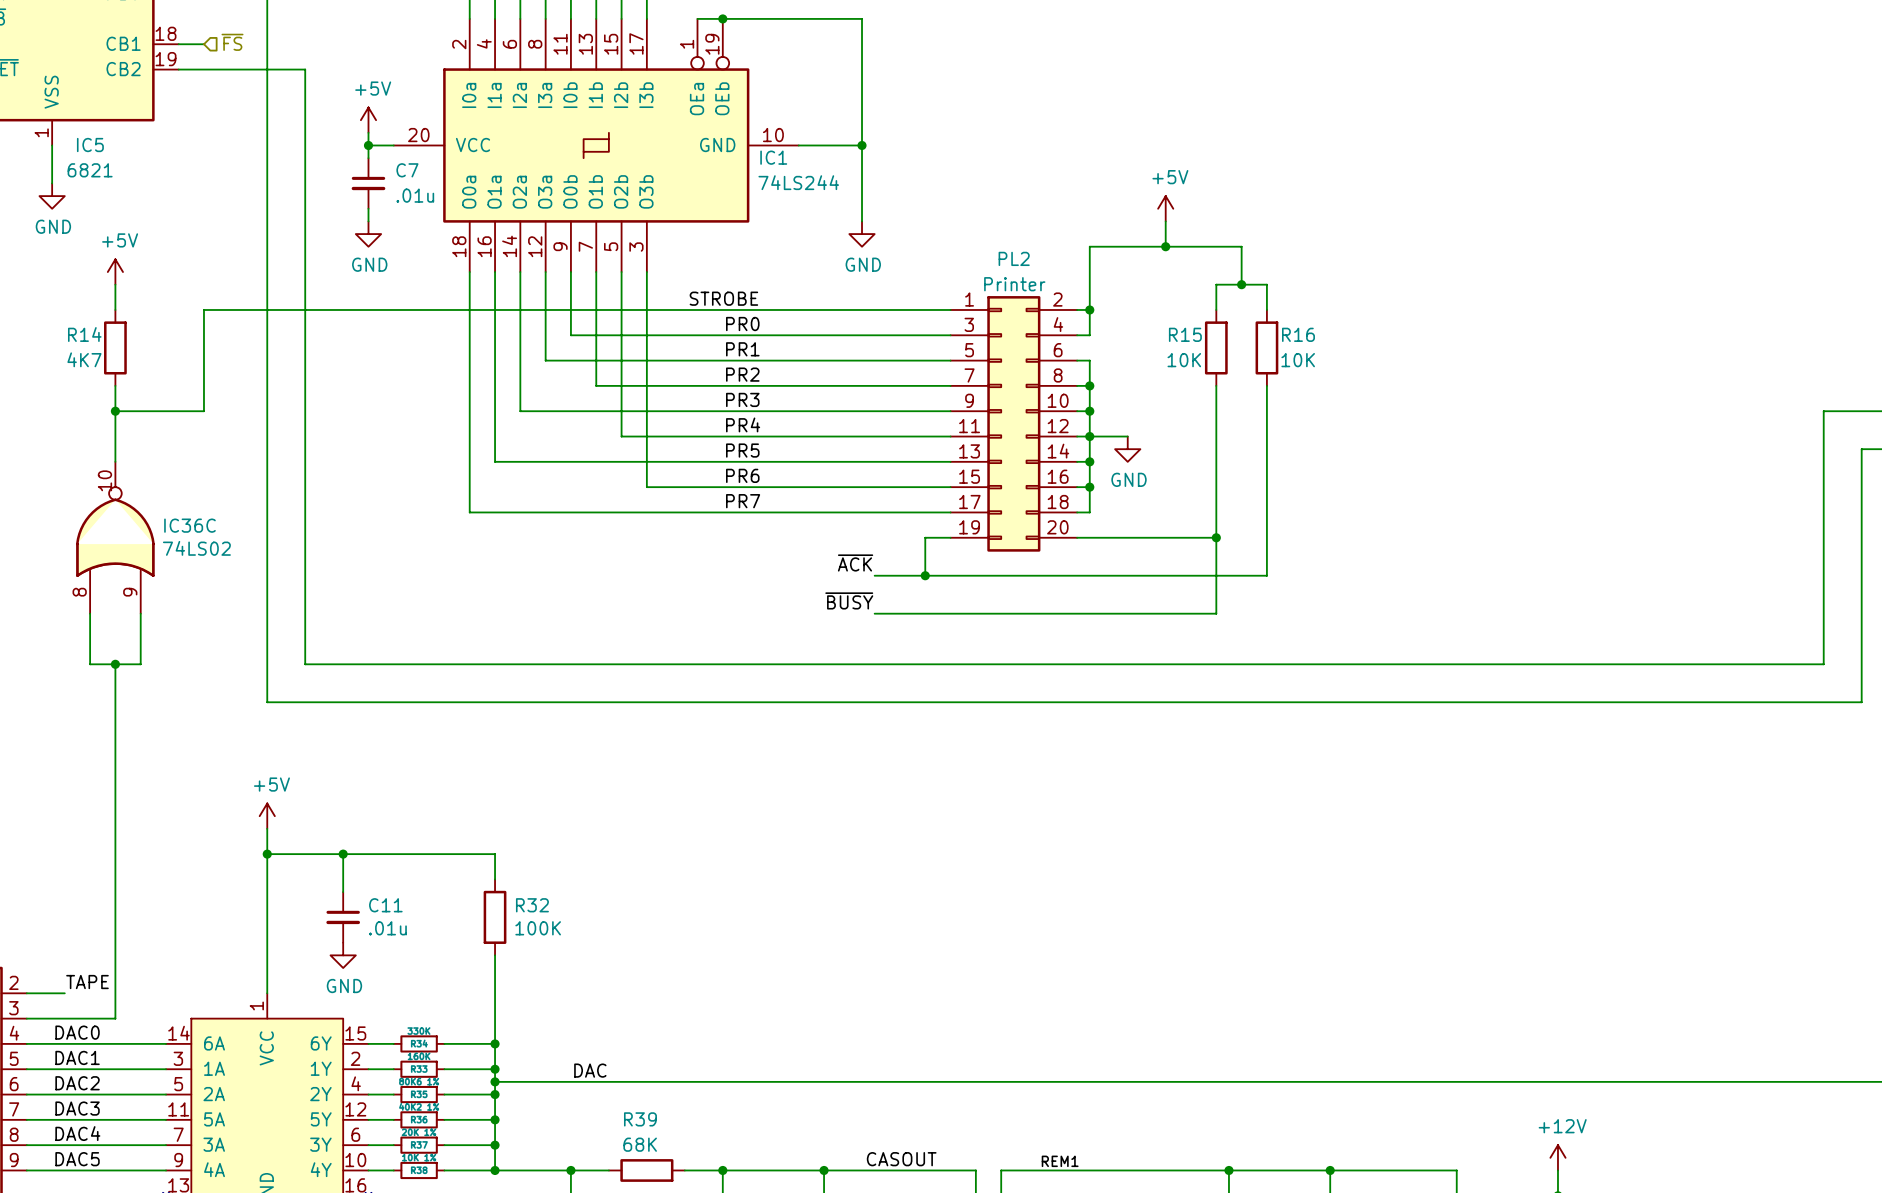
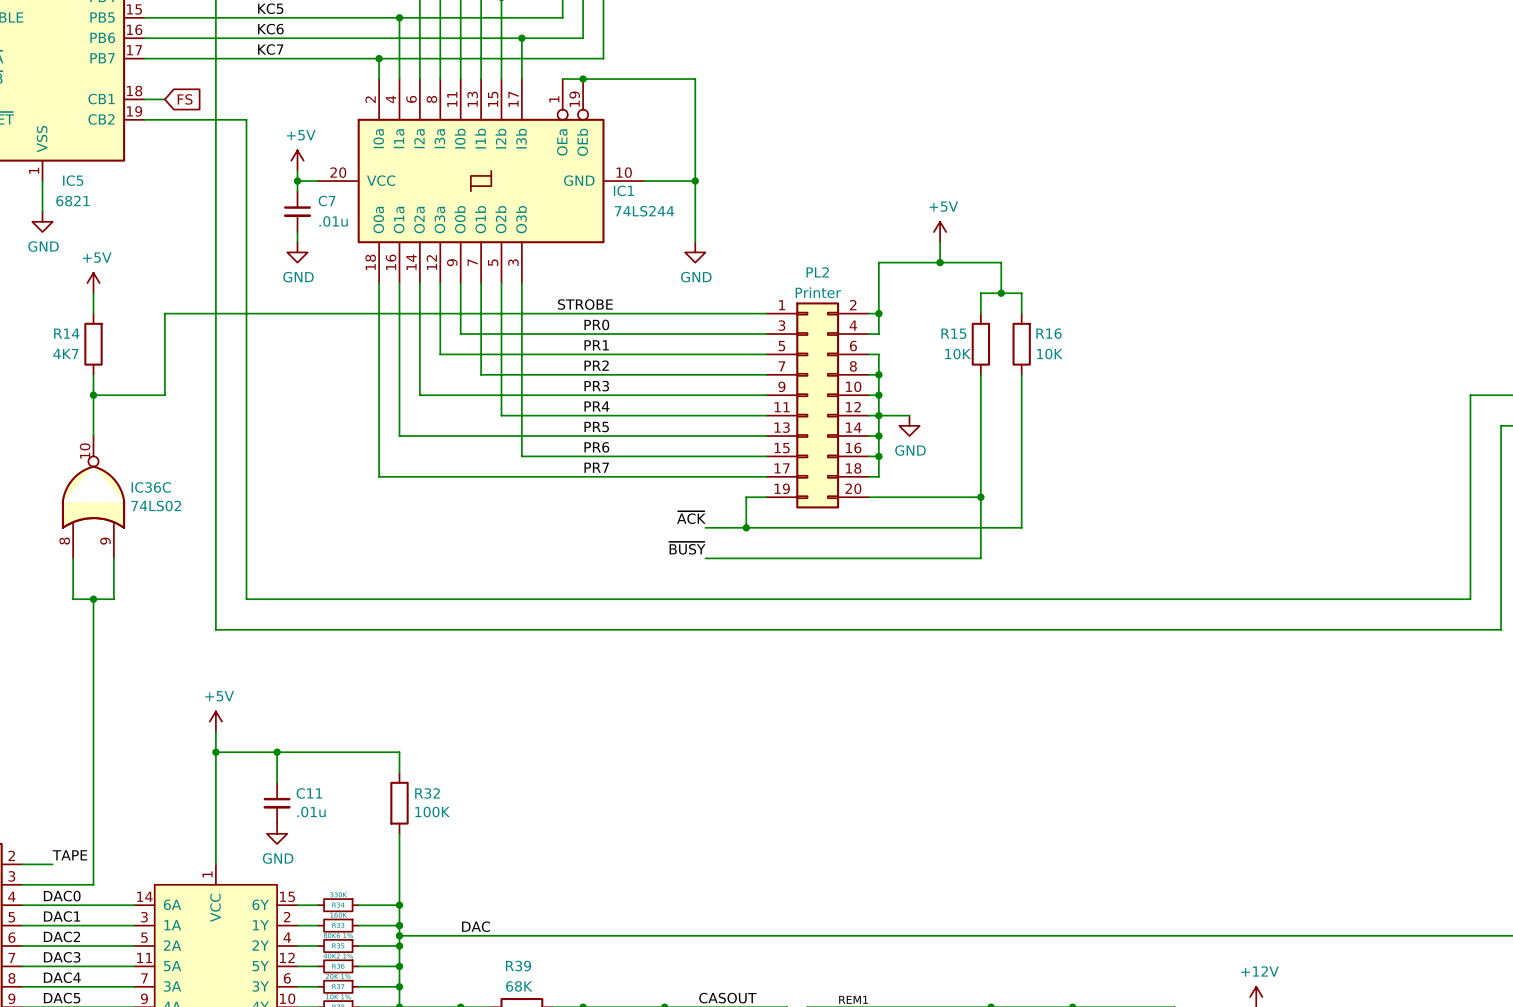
hierarchical label: ~{FS} (232, 42) -> none
global label: none -> FS (185, 99)

